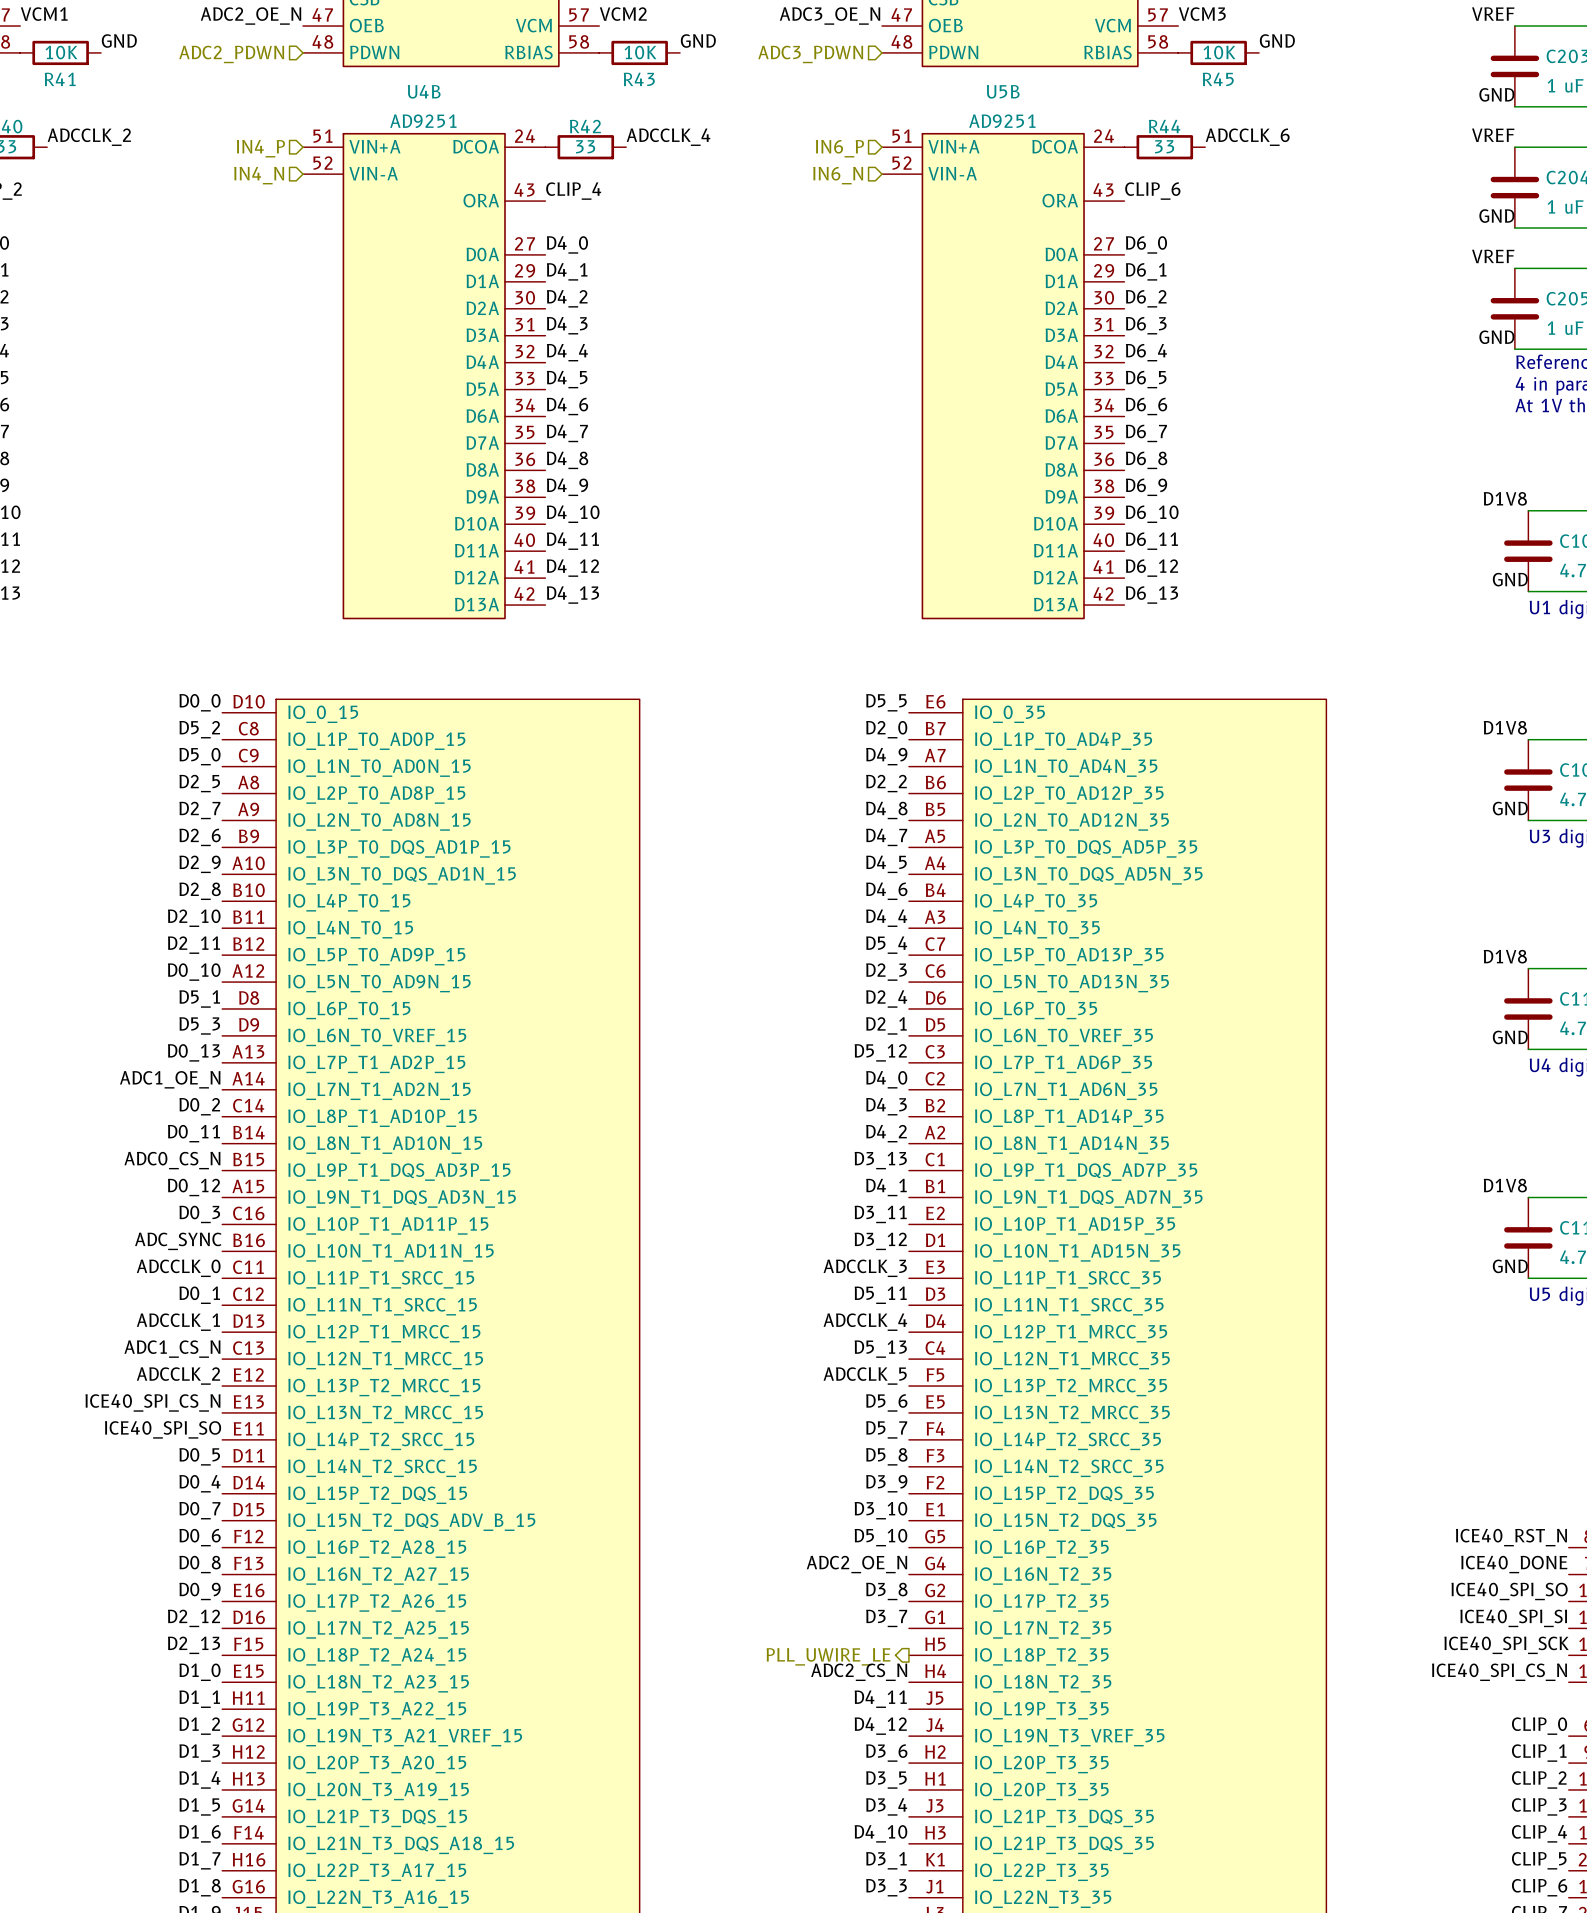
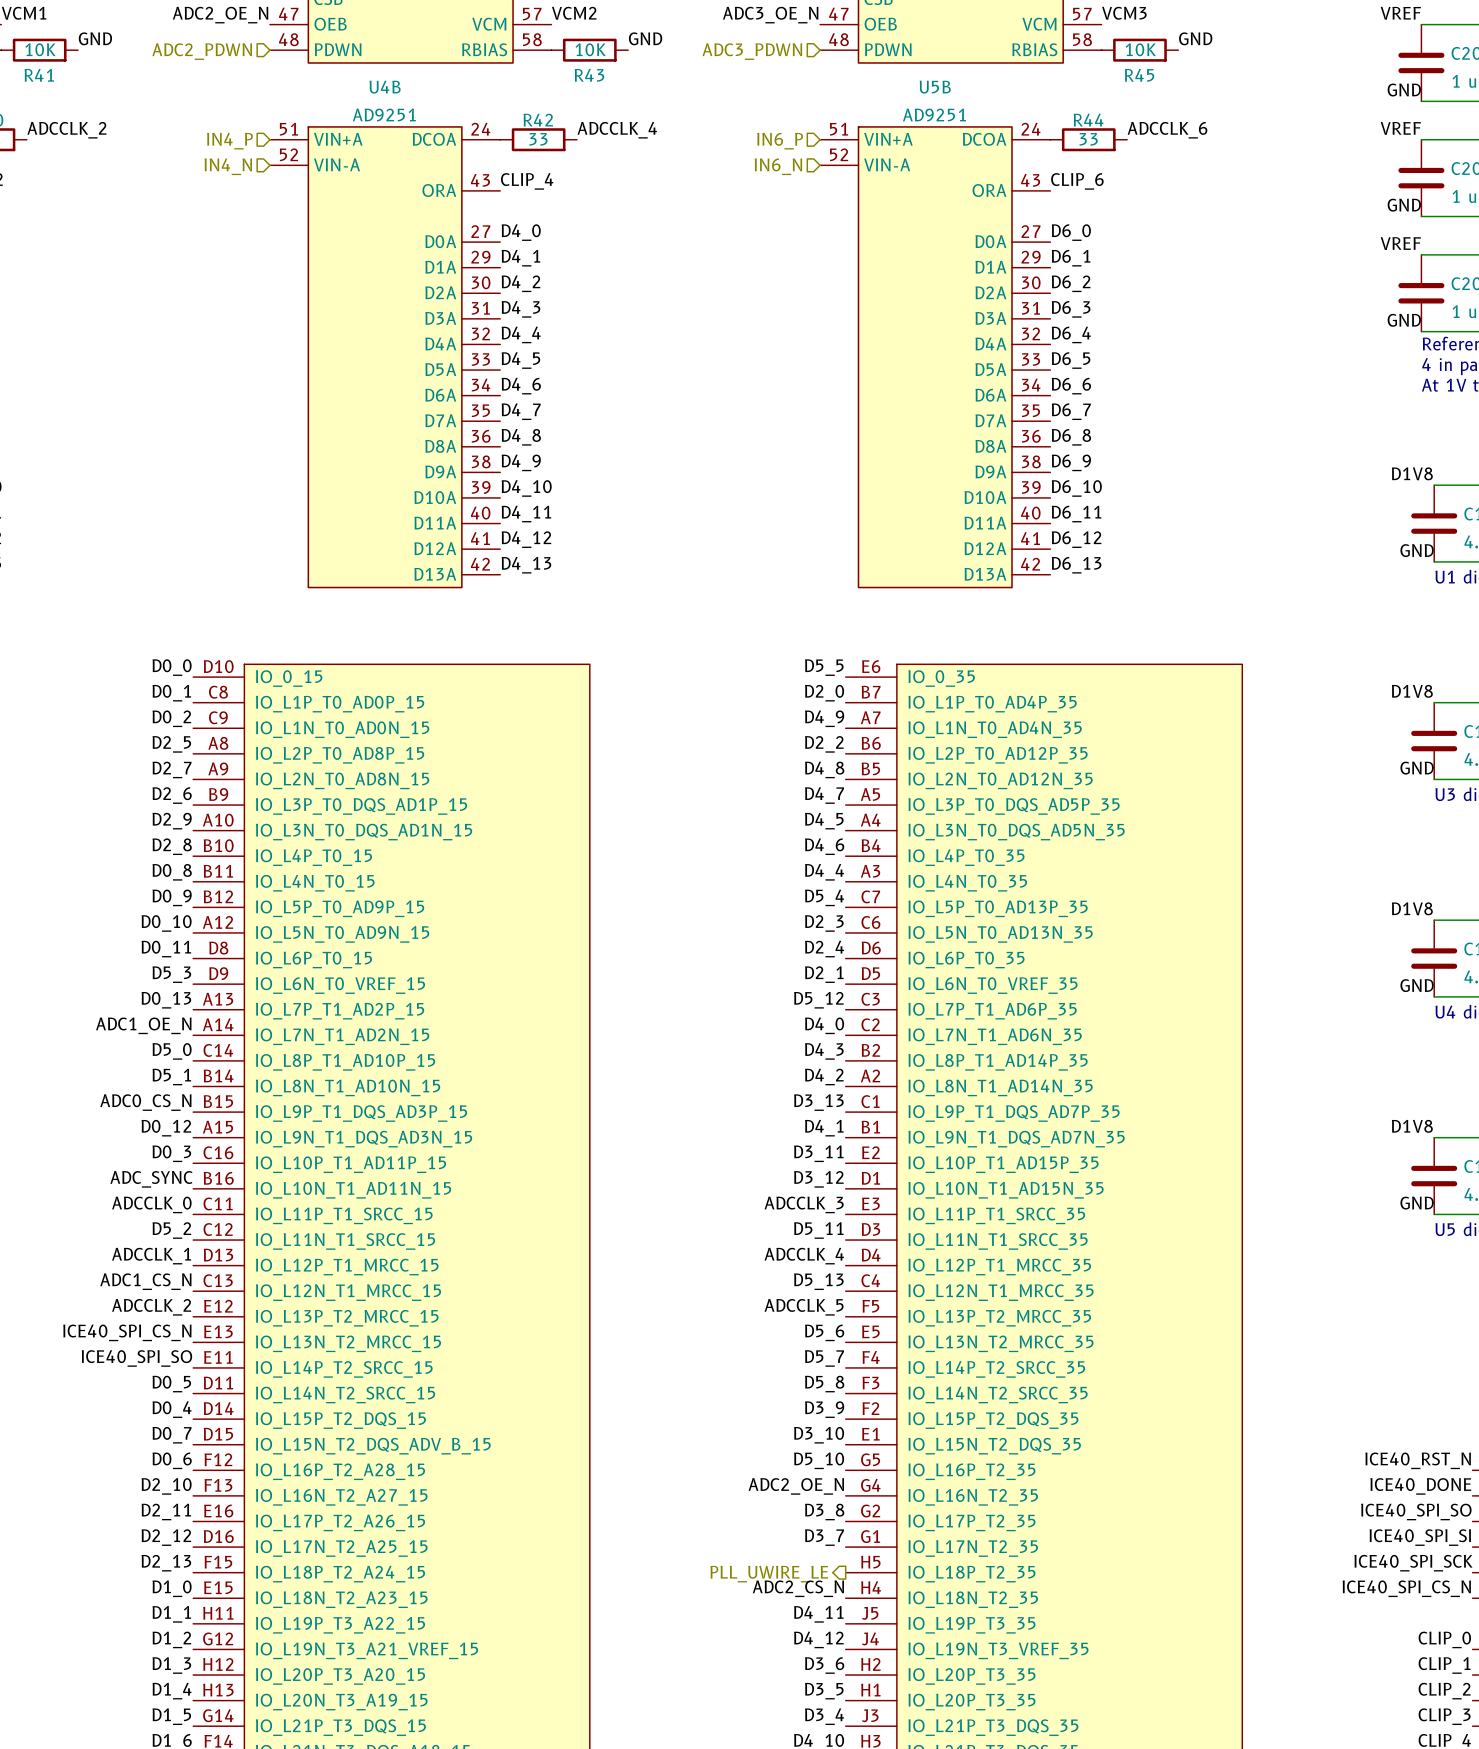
label: D5_2 (199, 729) -> D0_1 (171, 693)
label: D5_0 (199, 756) -> D0_2 (171, 718)
label: D2_10 (194, 918) -> D0_8 (172, 872)
label: D2_11 (193, 945) -> D0_9 (172, 897)
label: D5_1 (199, 998) -> D0_11 (166, 949)
label: D0_2 (199, 1106) -> D5_0 (172, 1051)
label: D0_11 (193, 1133) -> D5_1 (171, 1076)
label: D0_1 (199, 1295) -> D5_2 (171, 1230)
label: D0_8 (200, 1564) -> D2_10 (166, 1486)
label: D0_9 (200, 1591) -> D2_11 (166, 1511)

